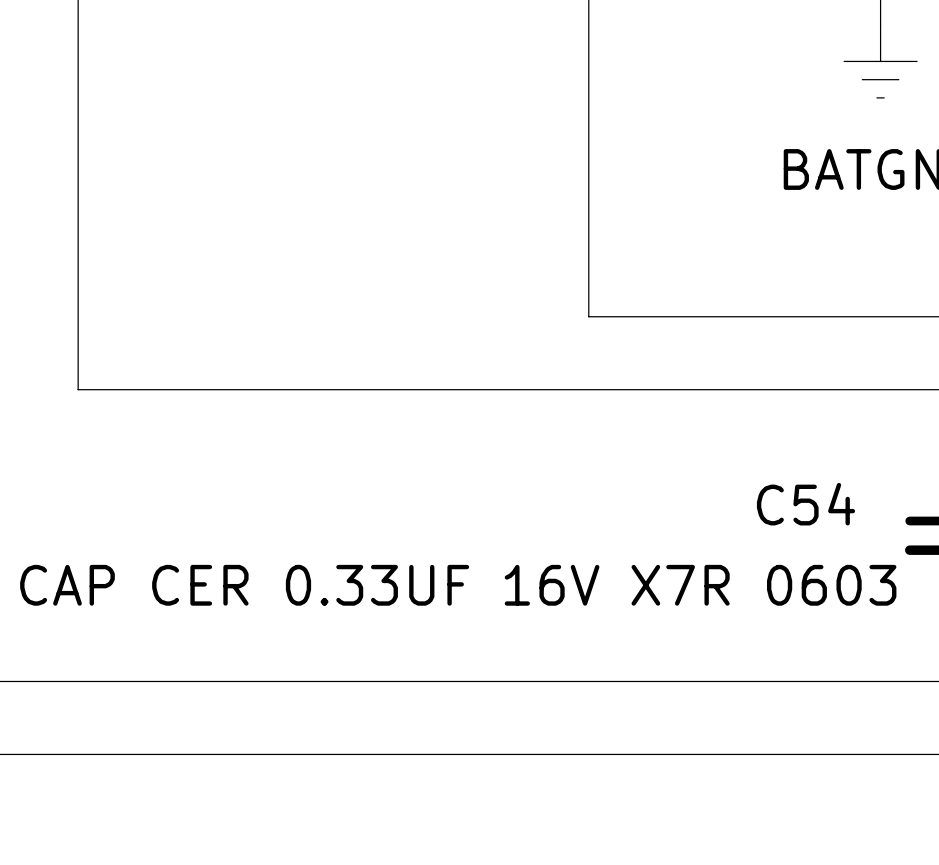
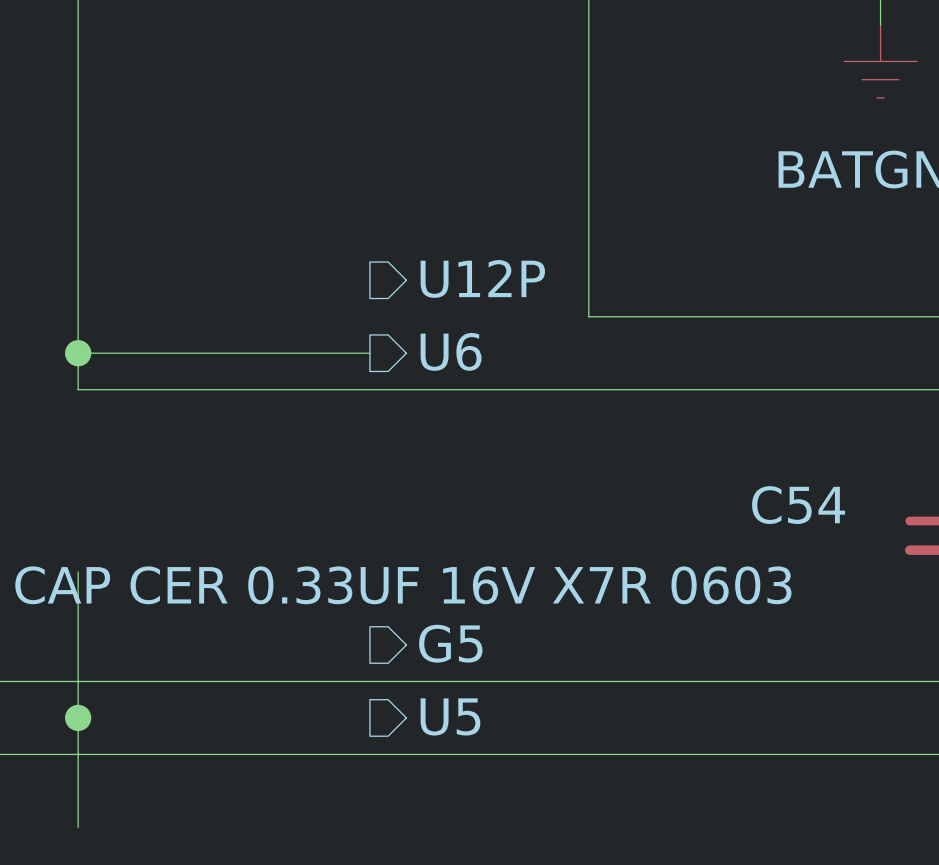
sheet pin: none -> U12P (482, 278)
sheet pin: none -> U6 (451, 351)
wire: none -> (78, 353) (369, 353)
junction: none -> (78, 353)
wire: none -> (78, 572) (78, 827)
sheet pin: none -> G5 (450, 643)
sheet pin: none -> U5 (450, 716)
junction: none -> (78, 717)

